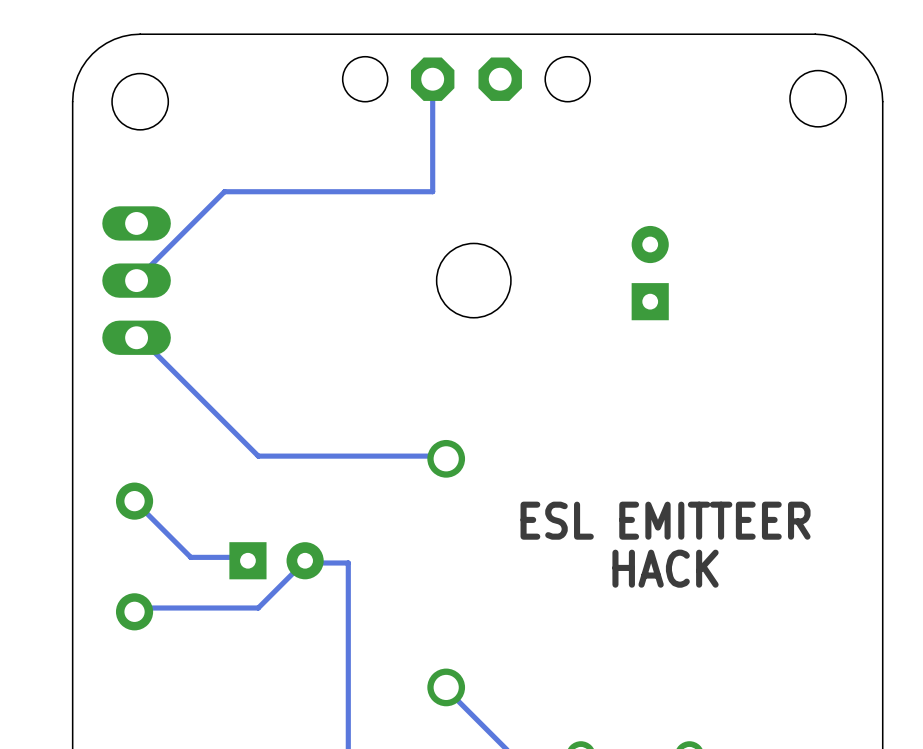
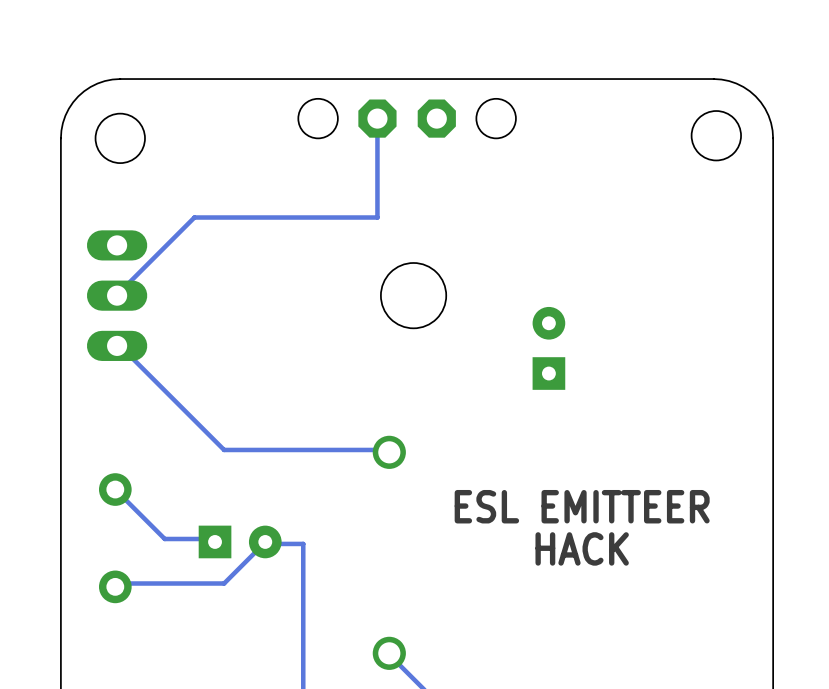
part position: (650, 273) -> (548, 348)

